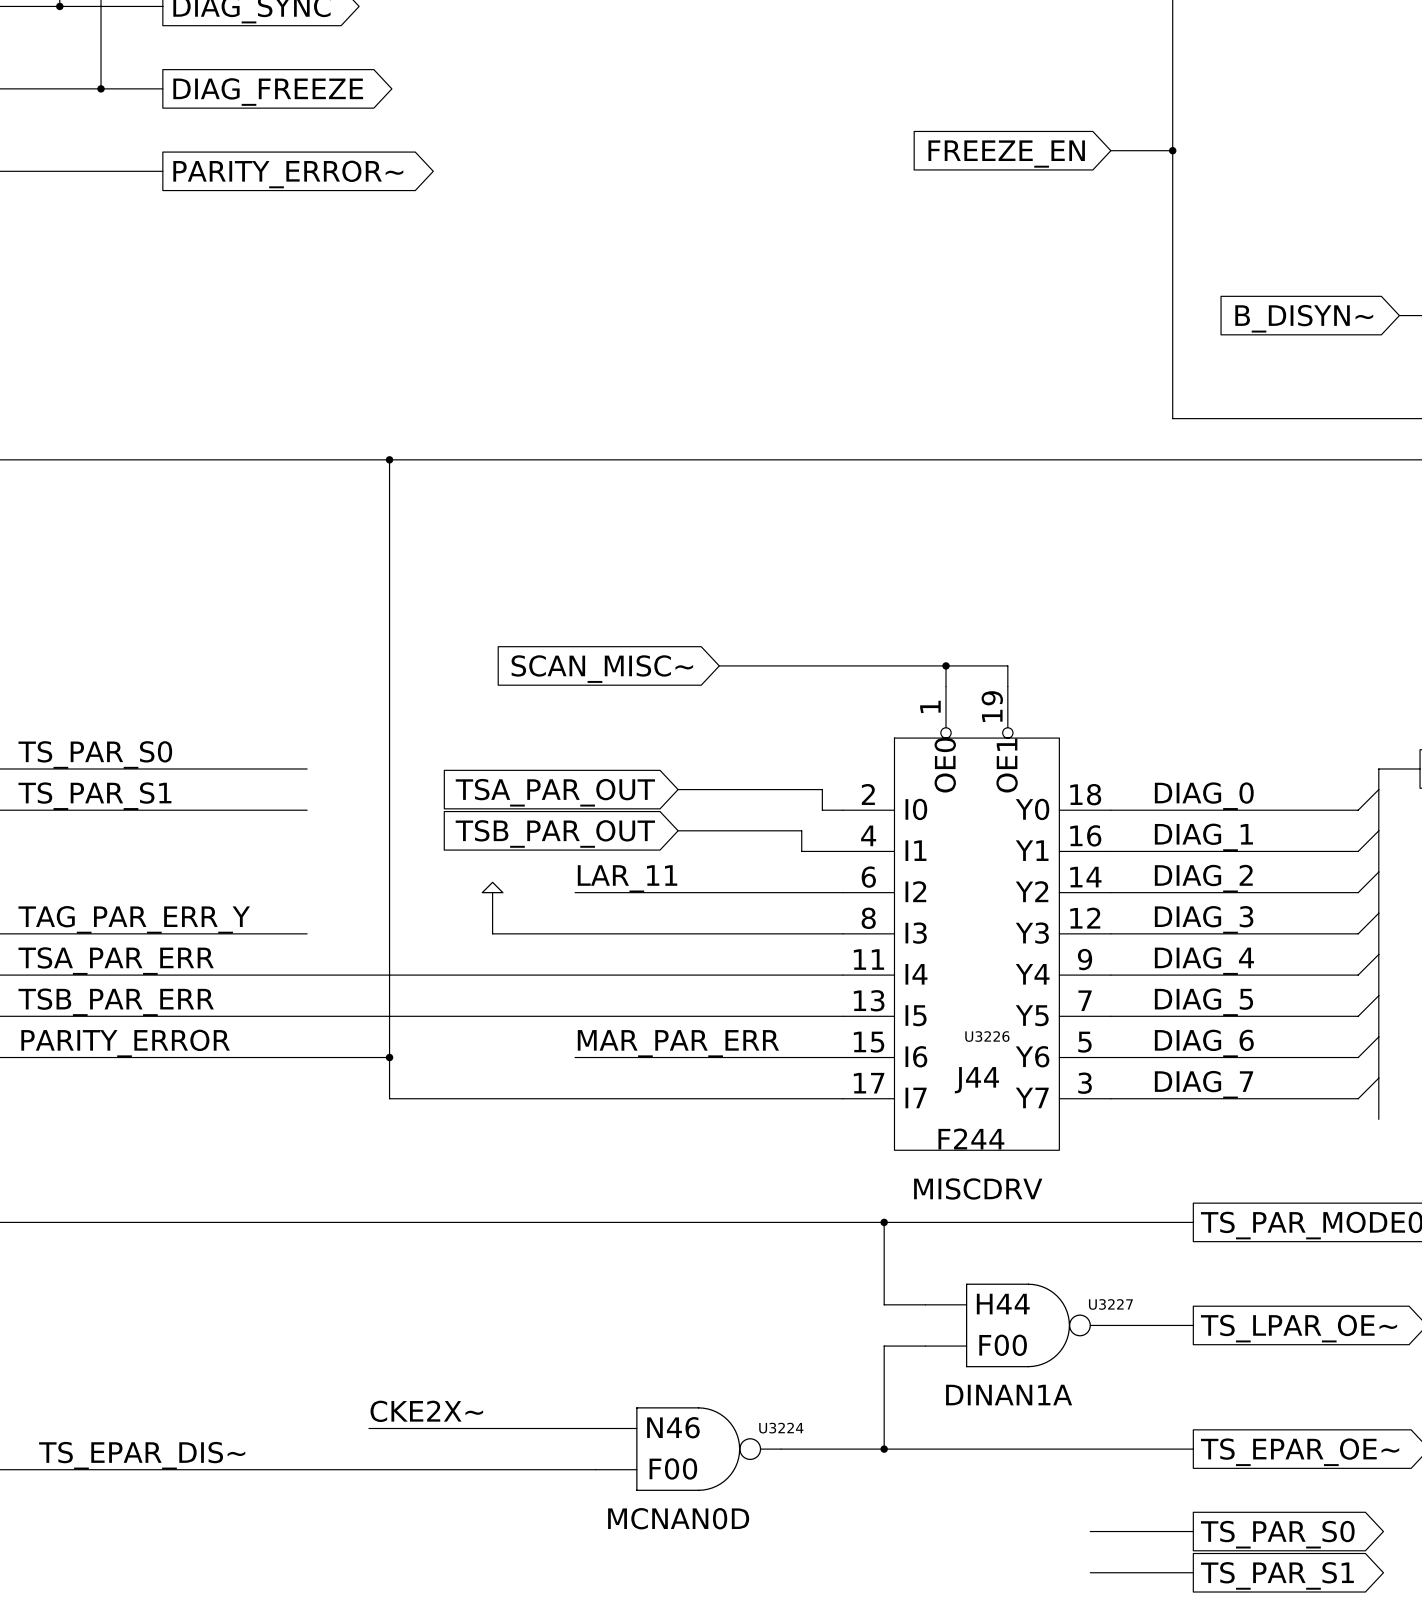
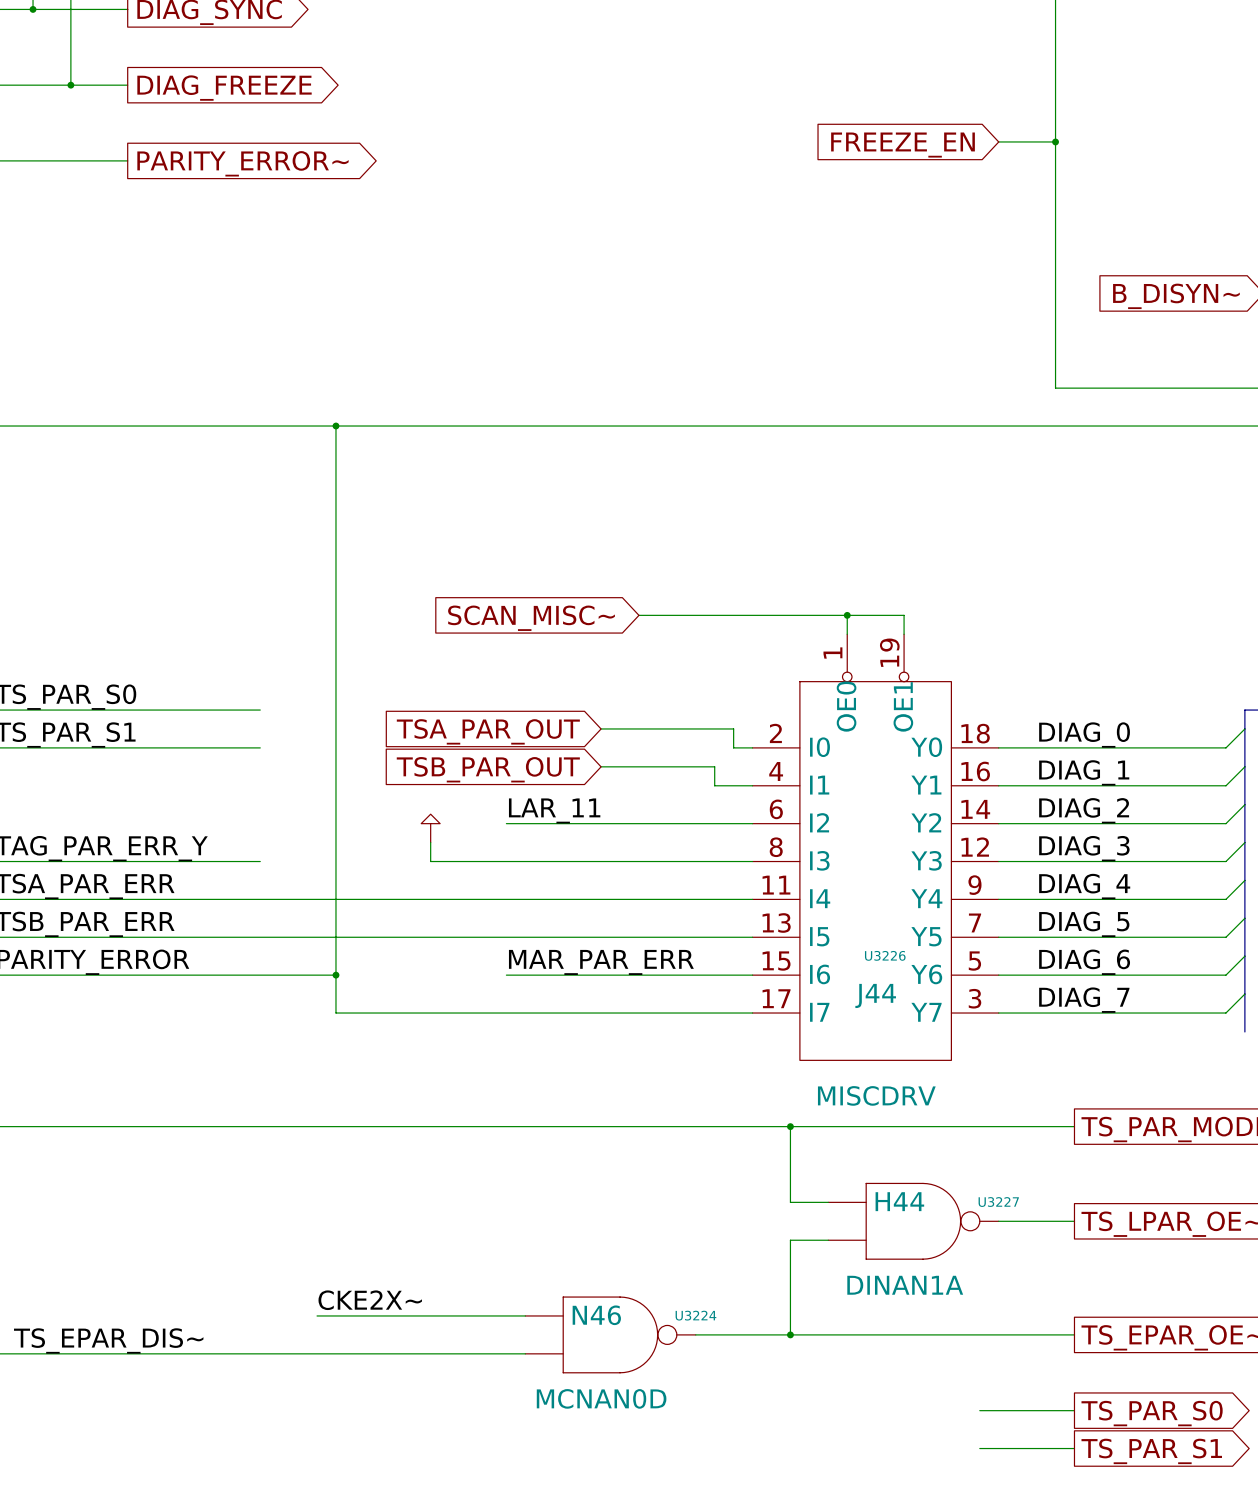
U3226 value: F244 (971, 1139) -> none
U3227 value: F00 (1003, 1345) -> none
U3224 value: F00 (673, 1468) -> none

